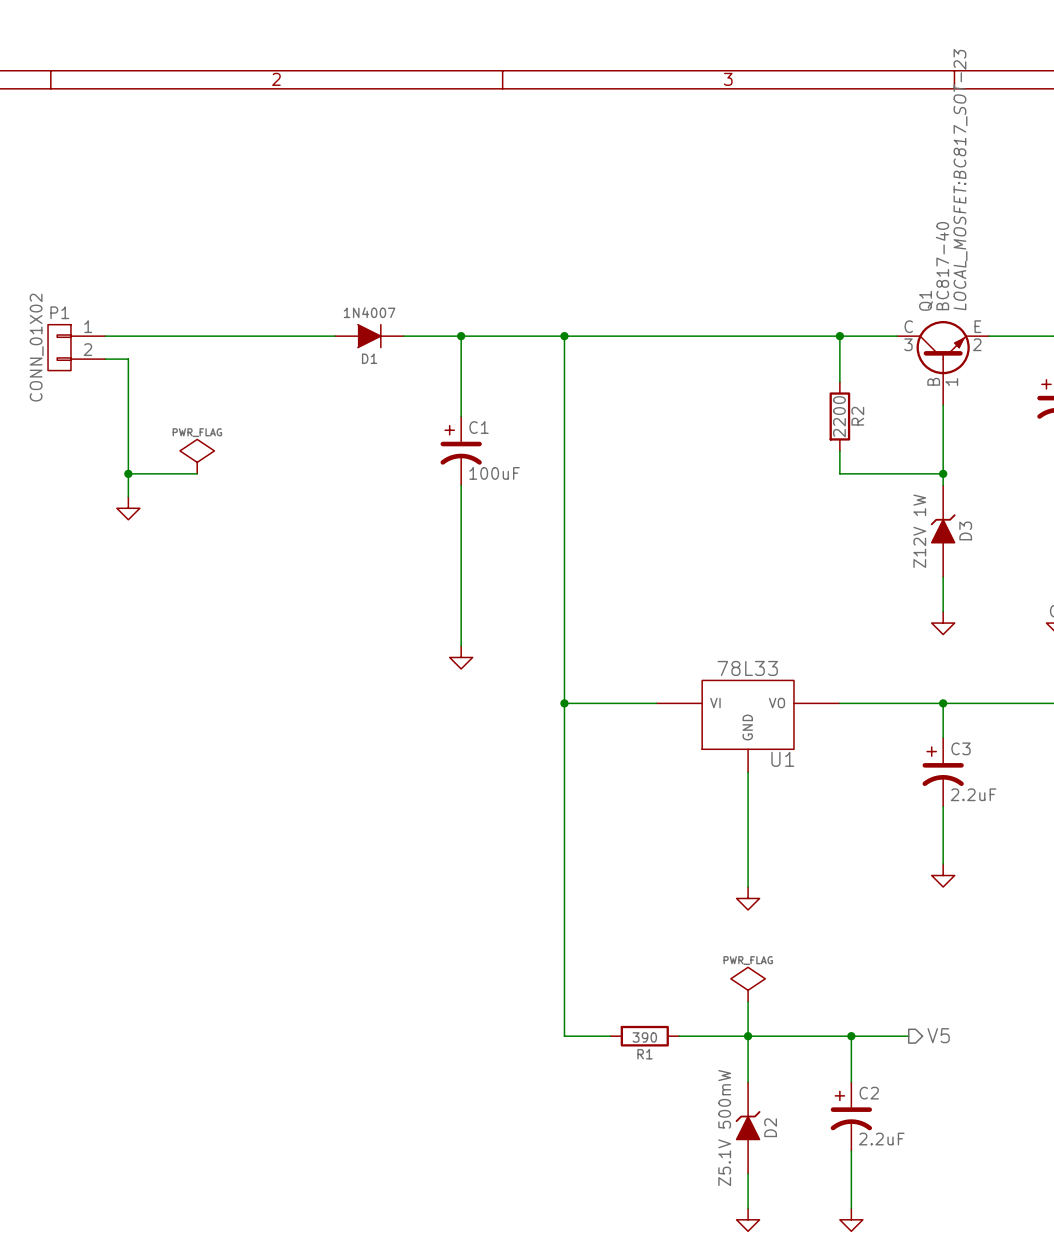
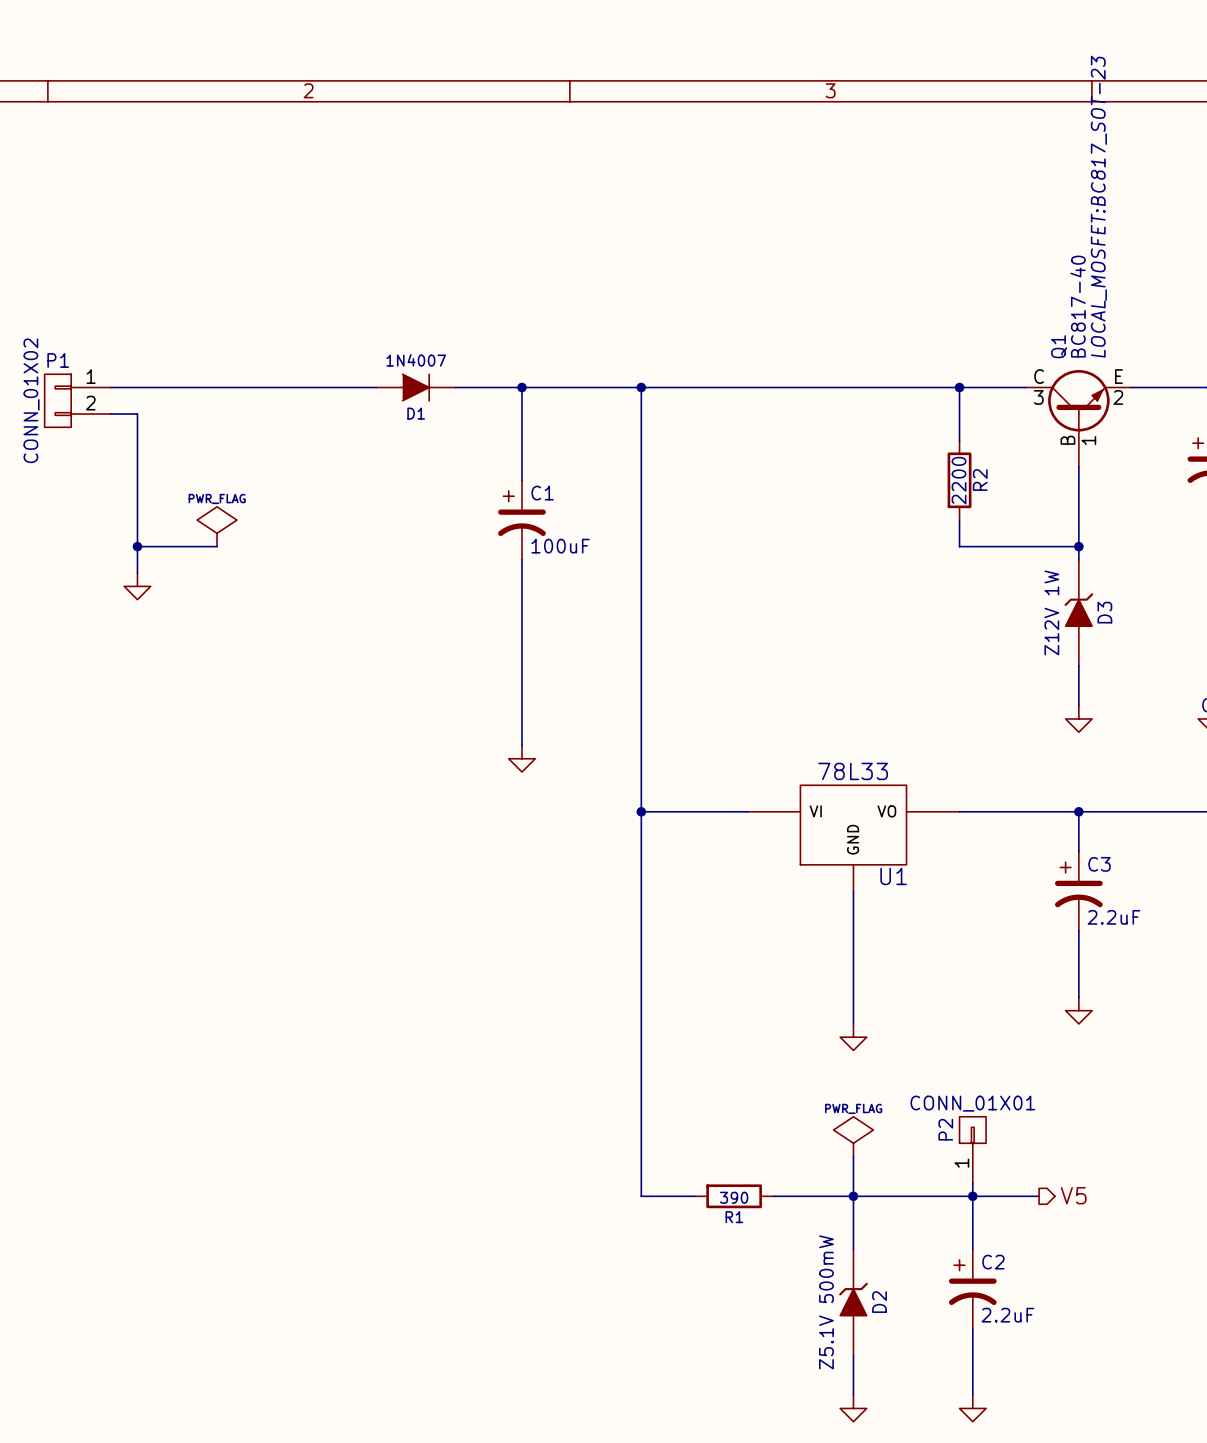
P2: none -> CONN_01X01 (972, 1149)
wire: none -> (972, 1183) (972, 1196)

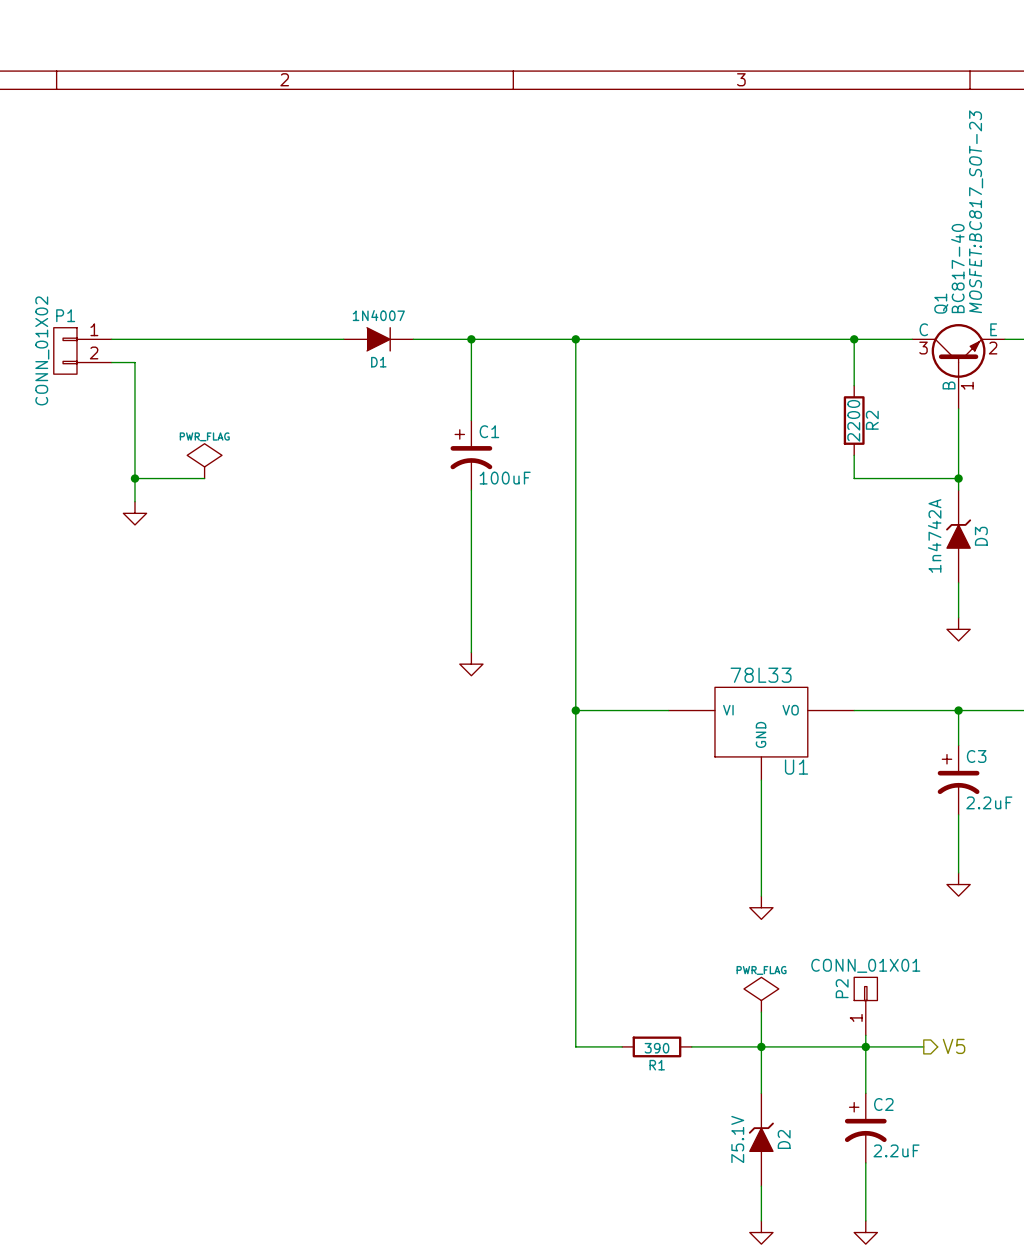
Q1 text: LOCAL_MOSFET:BC817_SOT-23 (1098, 206) -> MOSFET:BC817_SOT-23 (976, 211)
D3 value: Z12V 1W (1051, 612) -> 1n4742A (934, 535)
D2 value: Z5.1V 500mW (826, 1302) -> Z5.1V (737, 1139)

